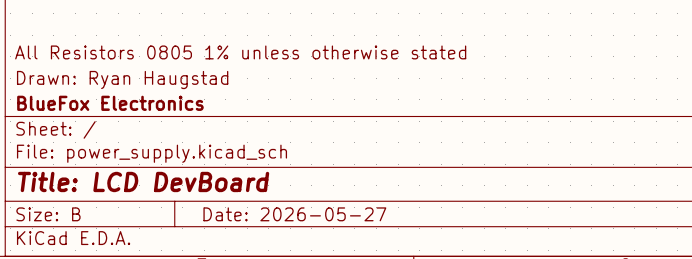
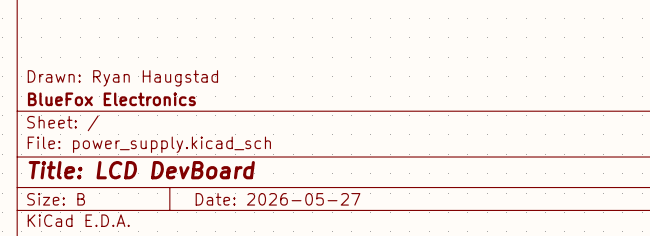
title block: All Resistors 0805 1% unless otherwise stated (240, 52) -> none

